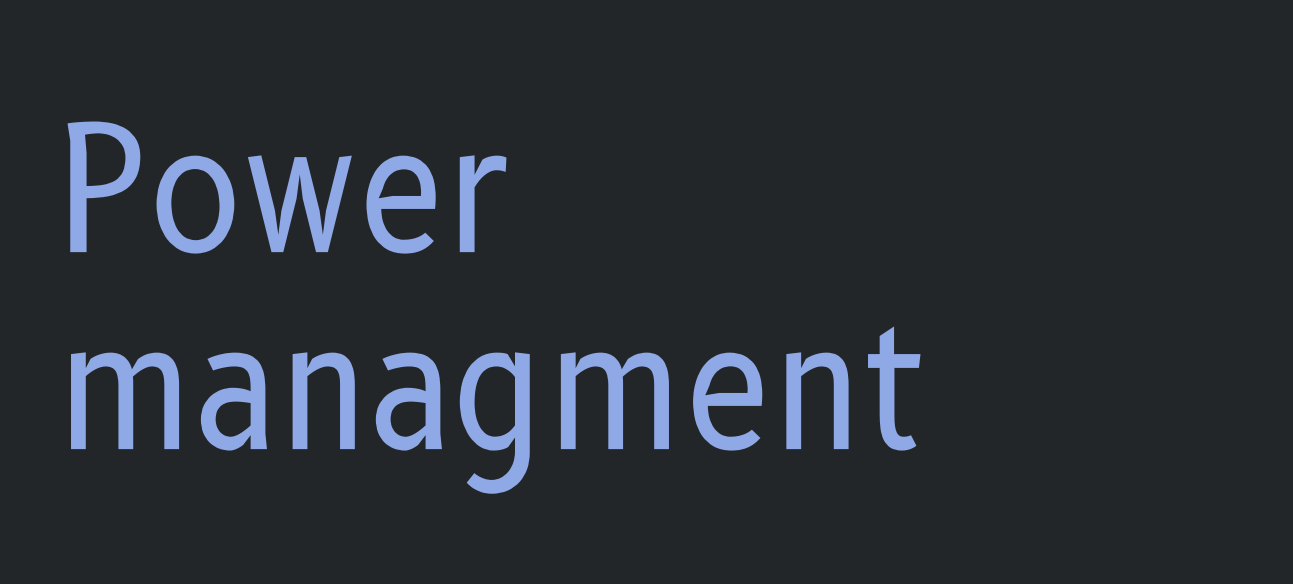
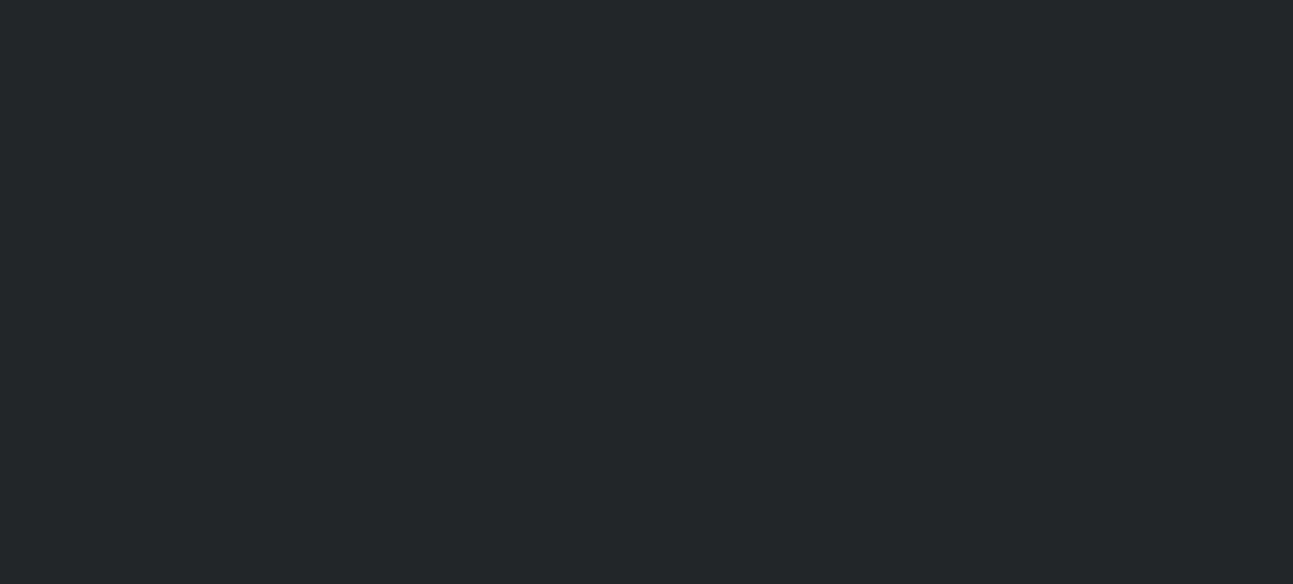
text: Power (286, 187) -> none
text: managment (495, 410) -> none

